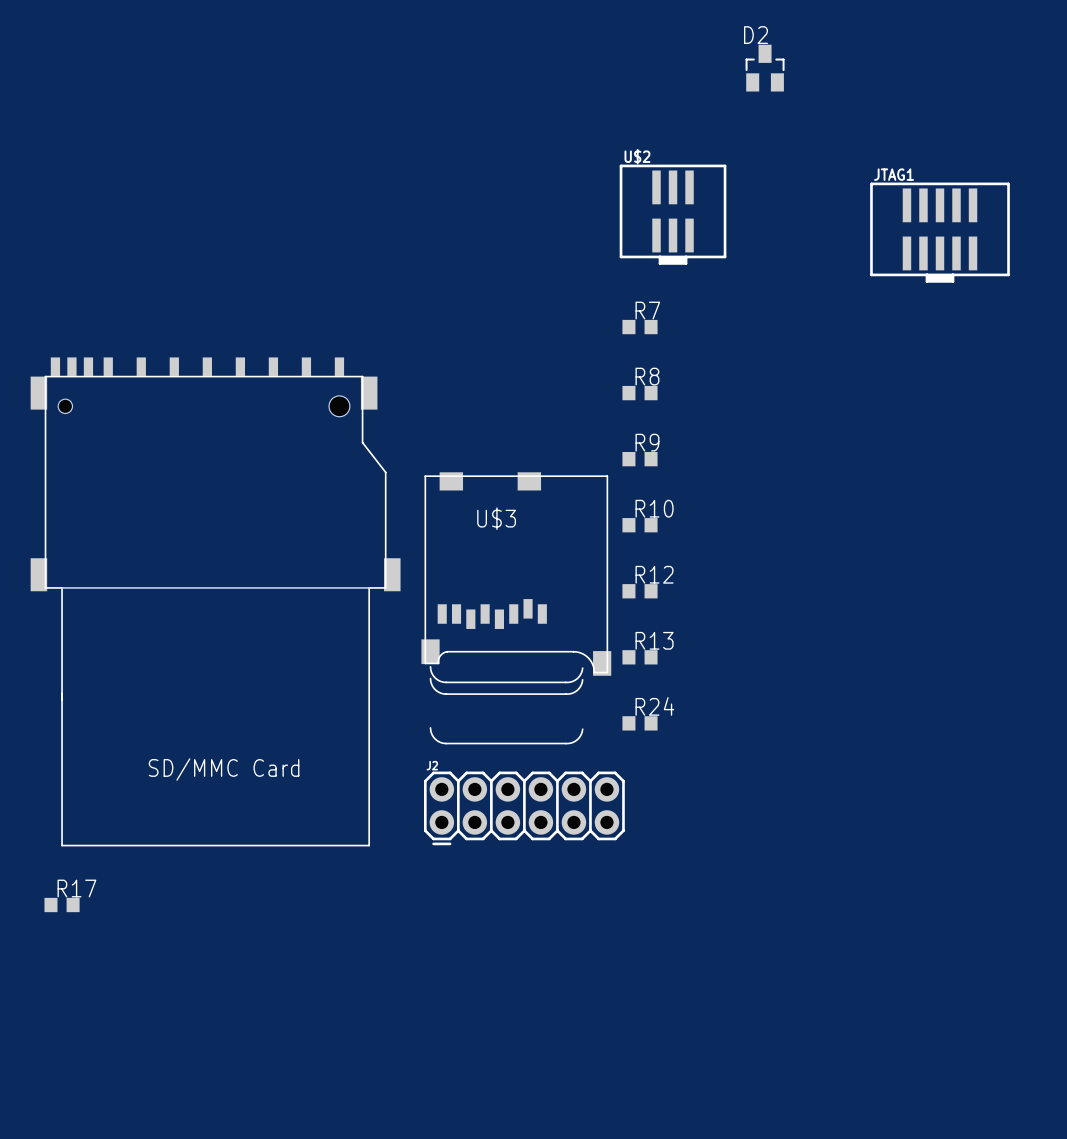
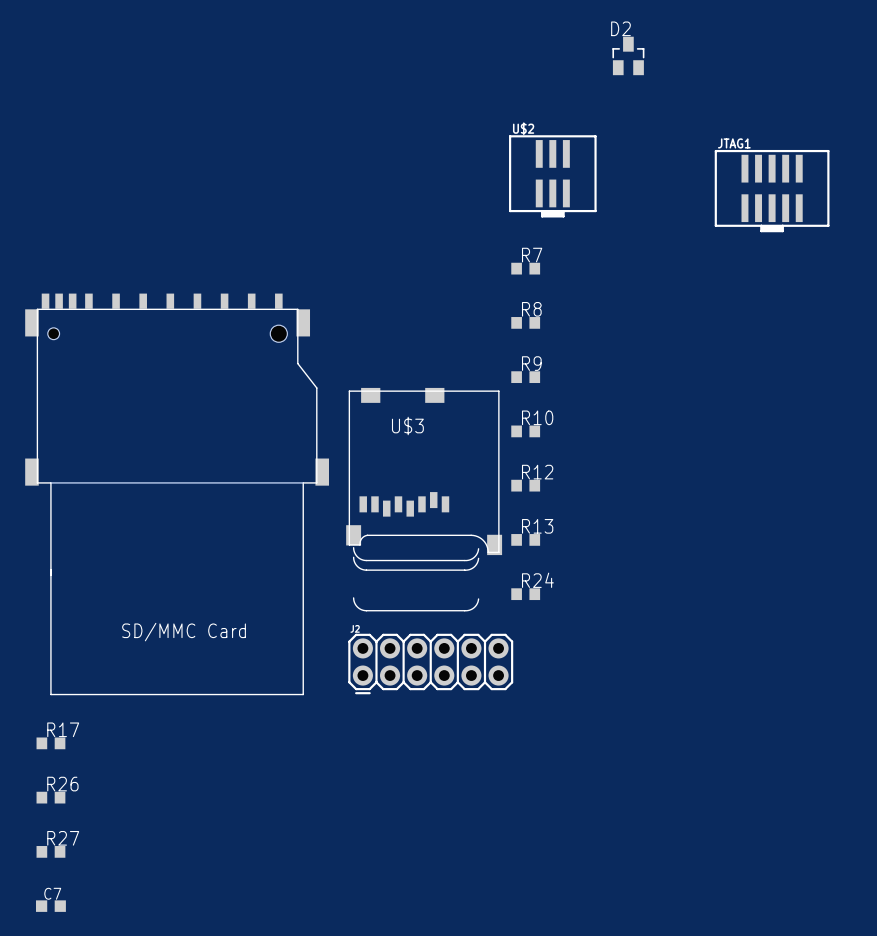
R26: none -> (50, 797)
R27: none -> (50, 851)
C7: none -> (50, 906)

